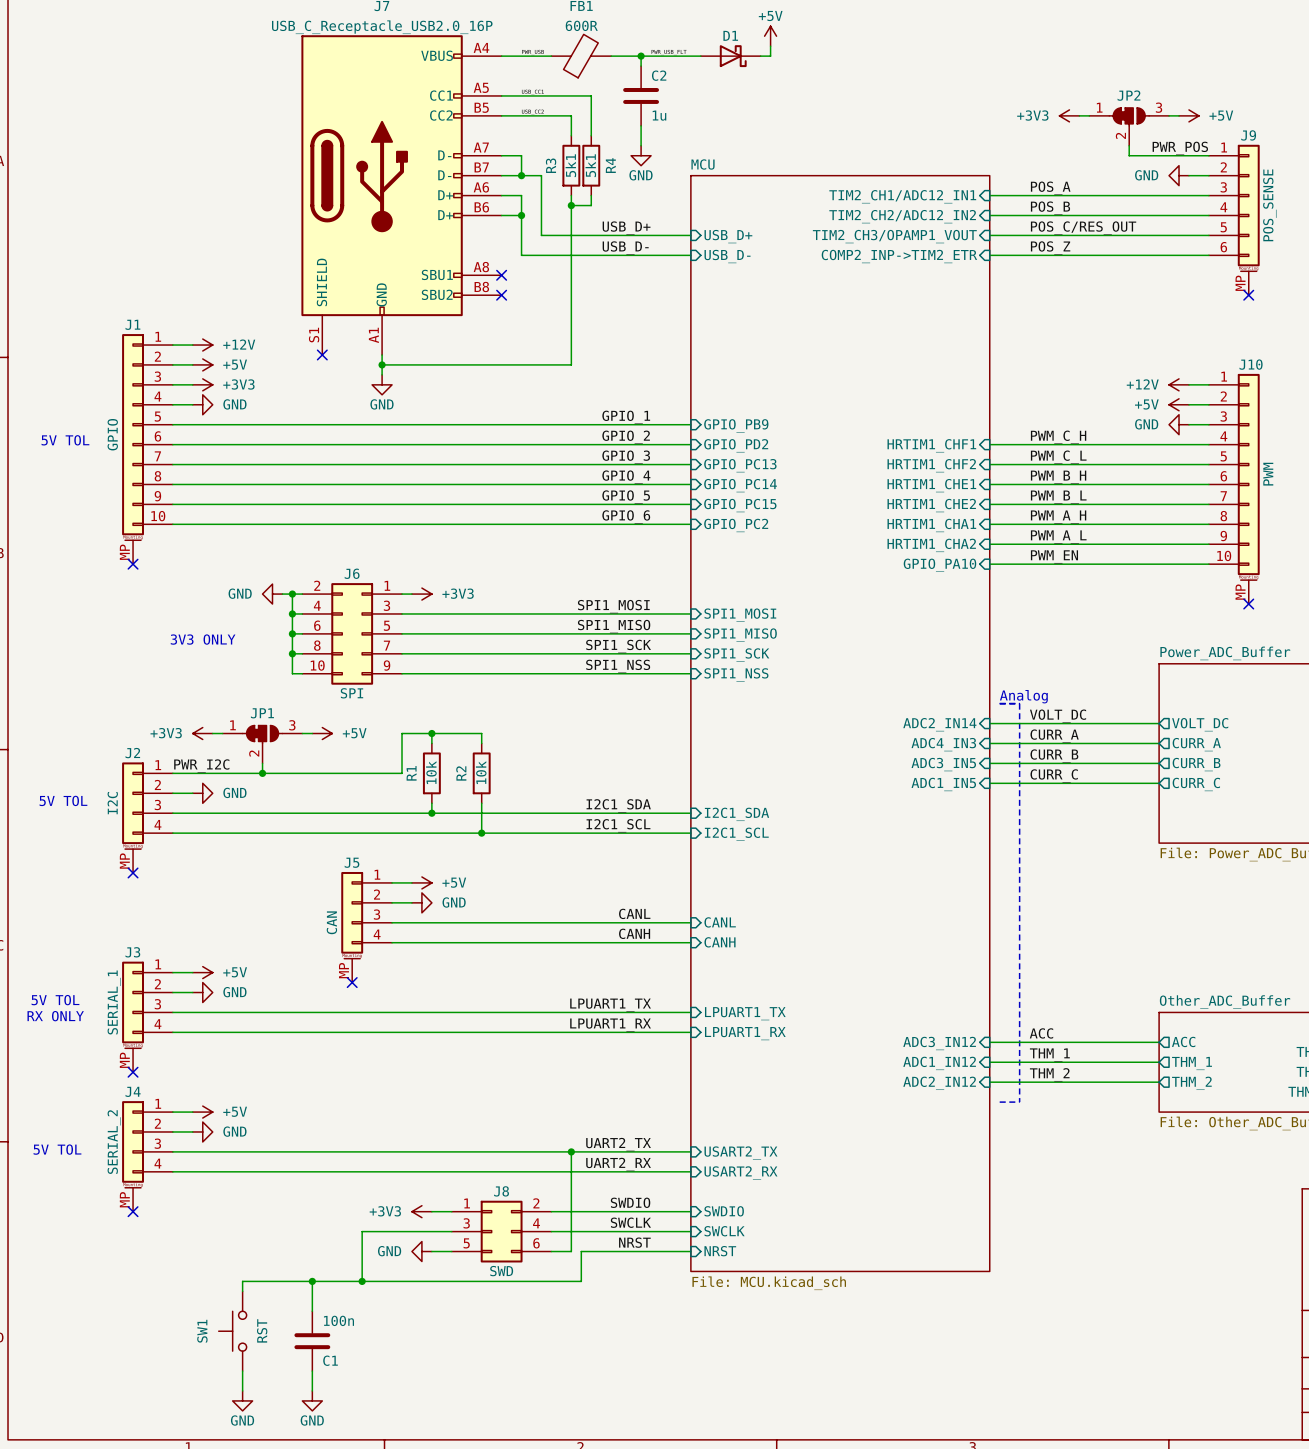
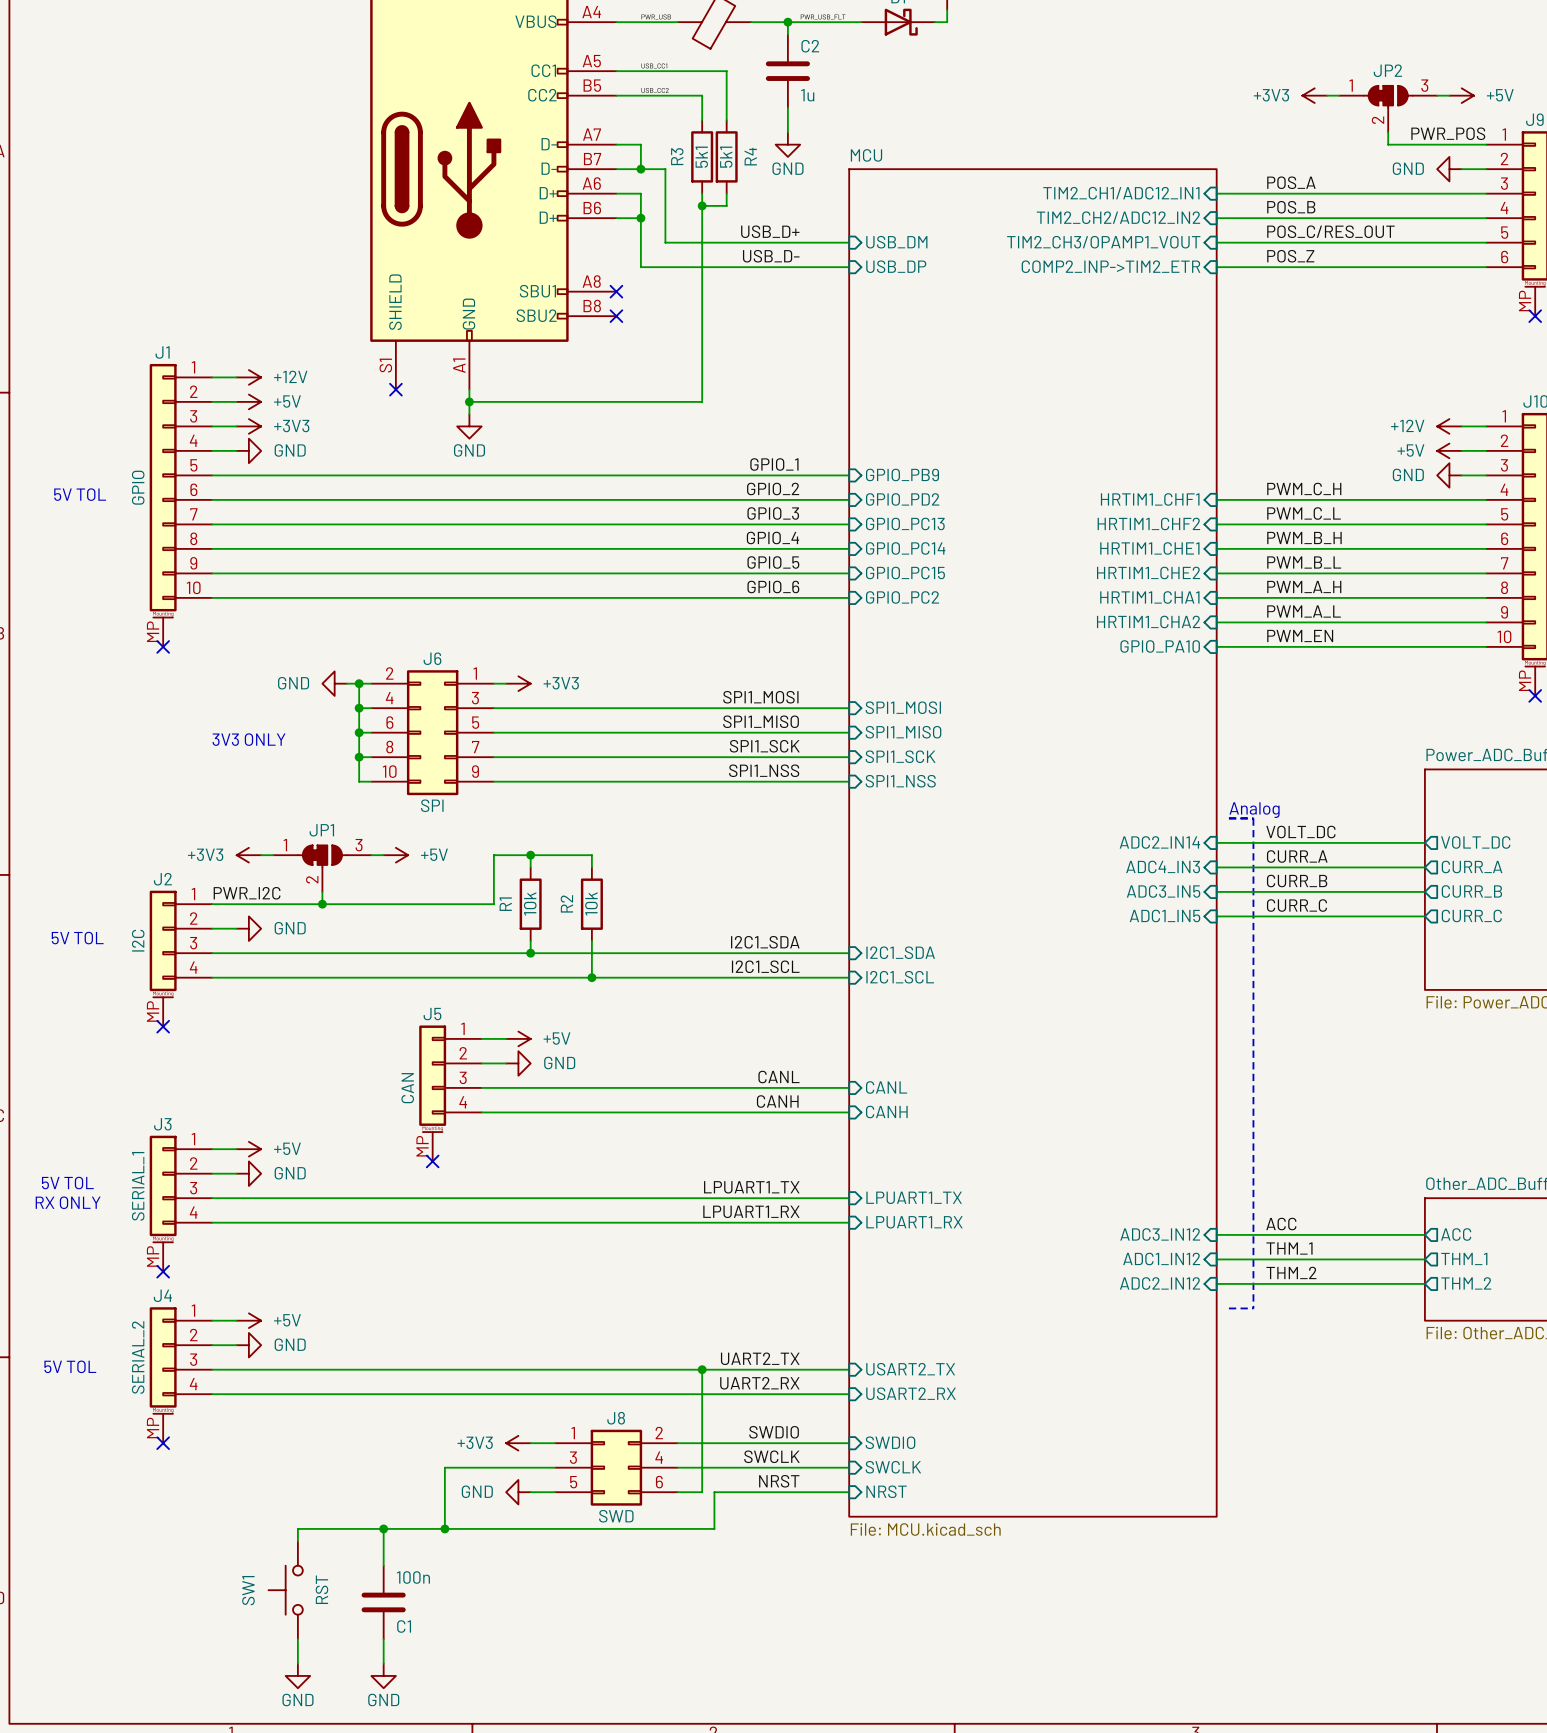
sheet pin: USB_D+ (728, 236) -> USB_DM (896, 242)
sheet pin: USB_D- (727, 256) -> USB_DP (896, 266)

